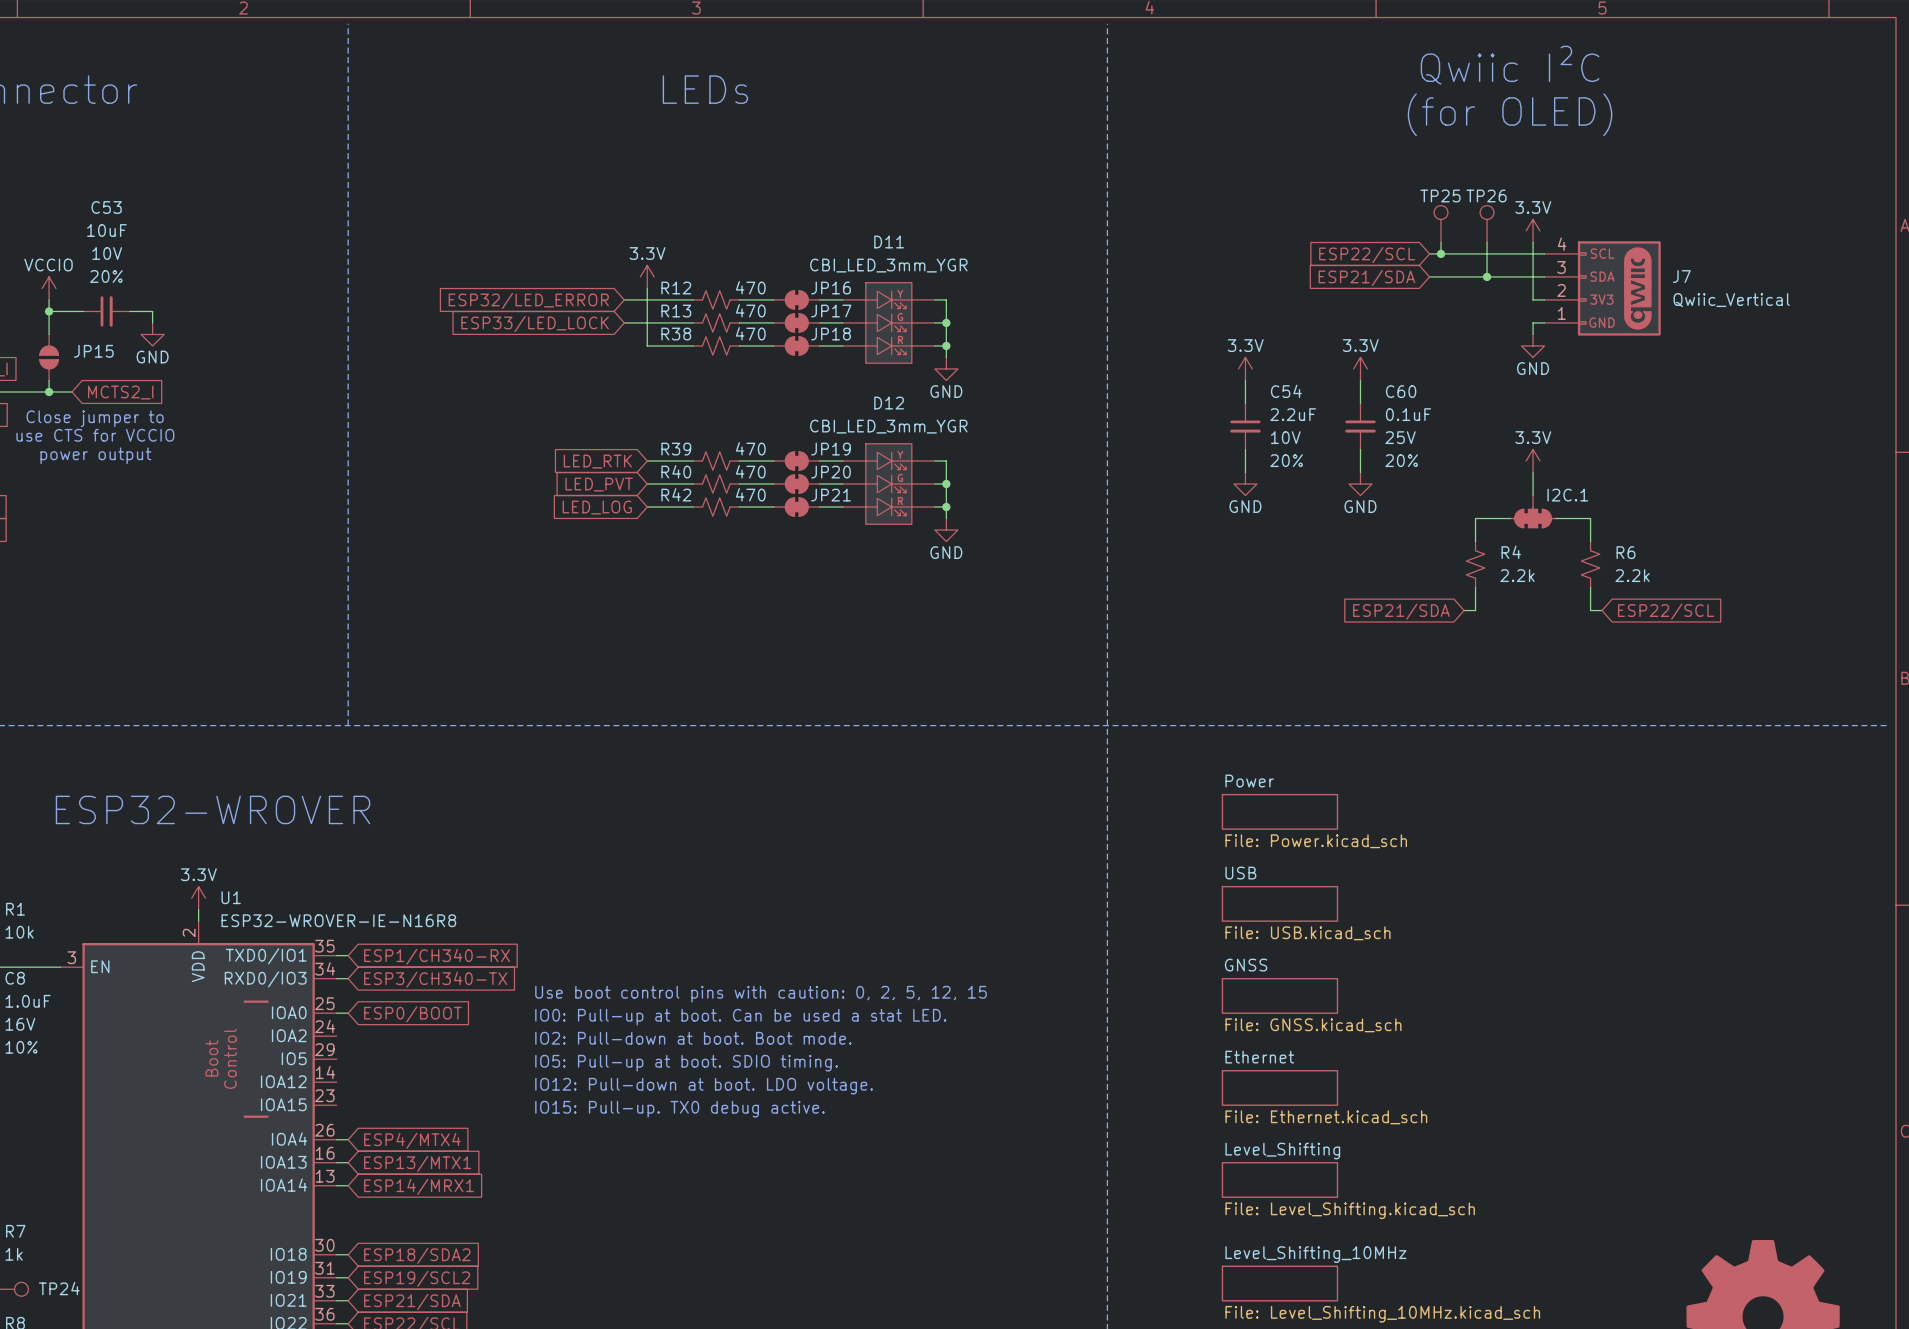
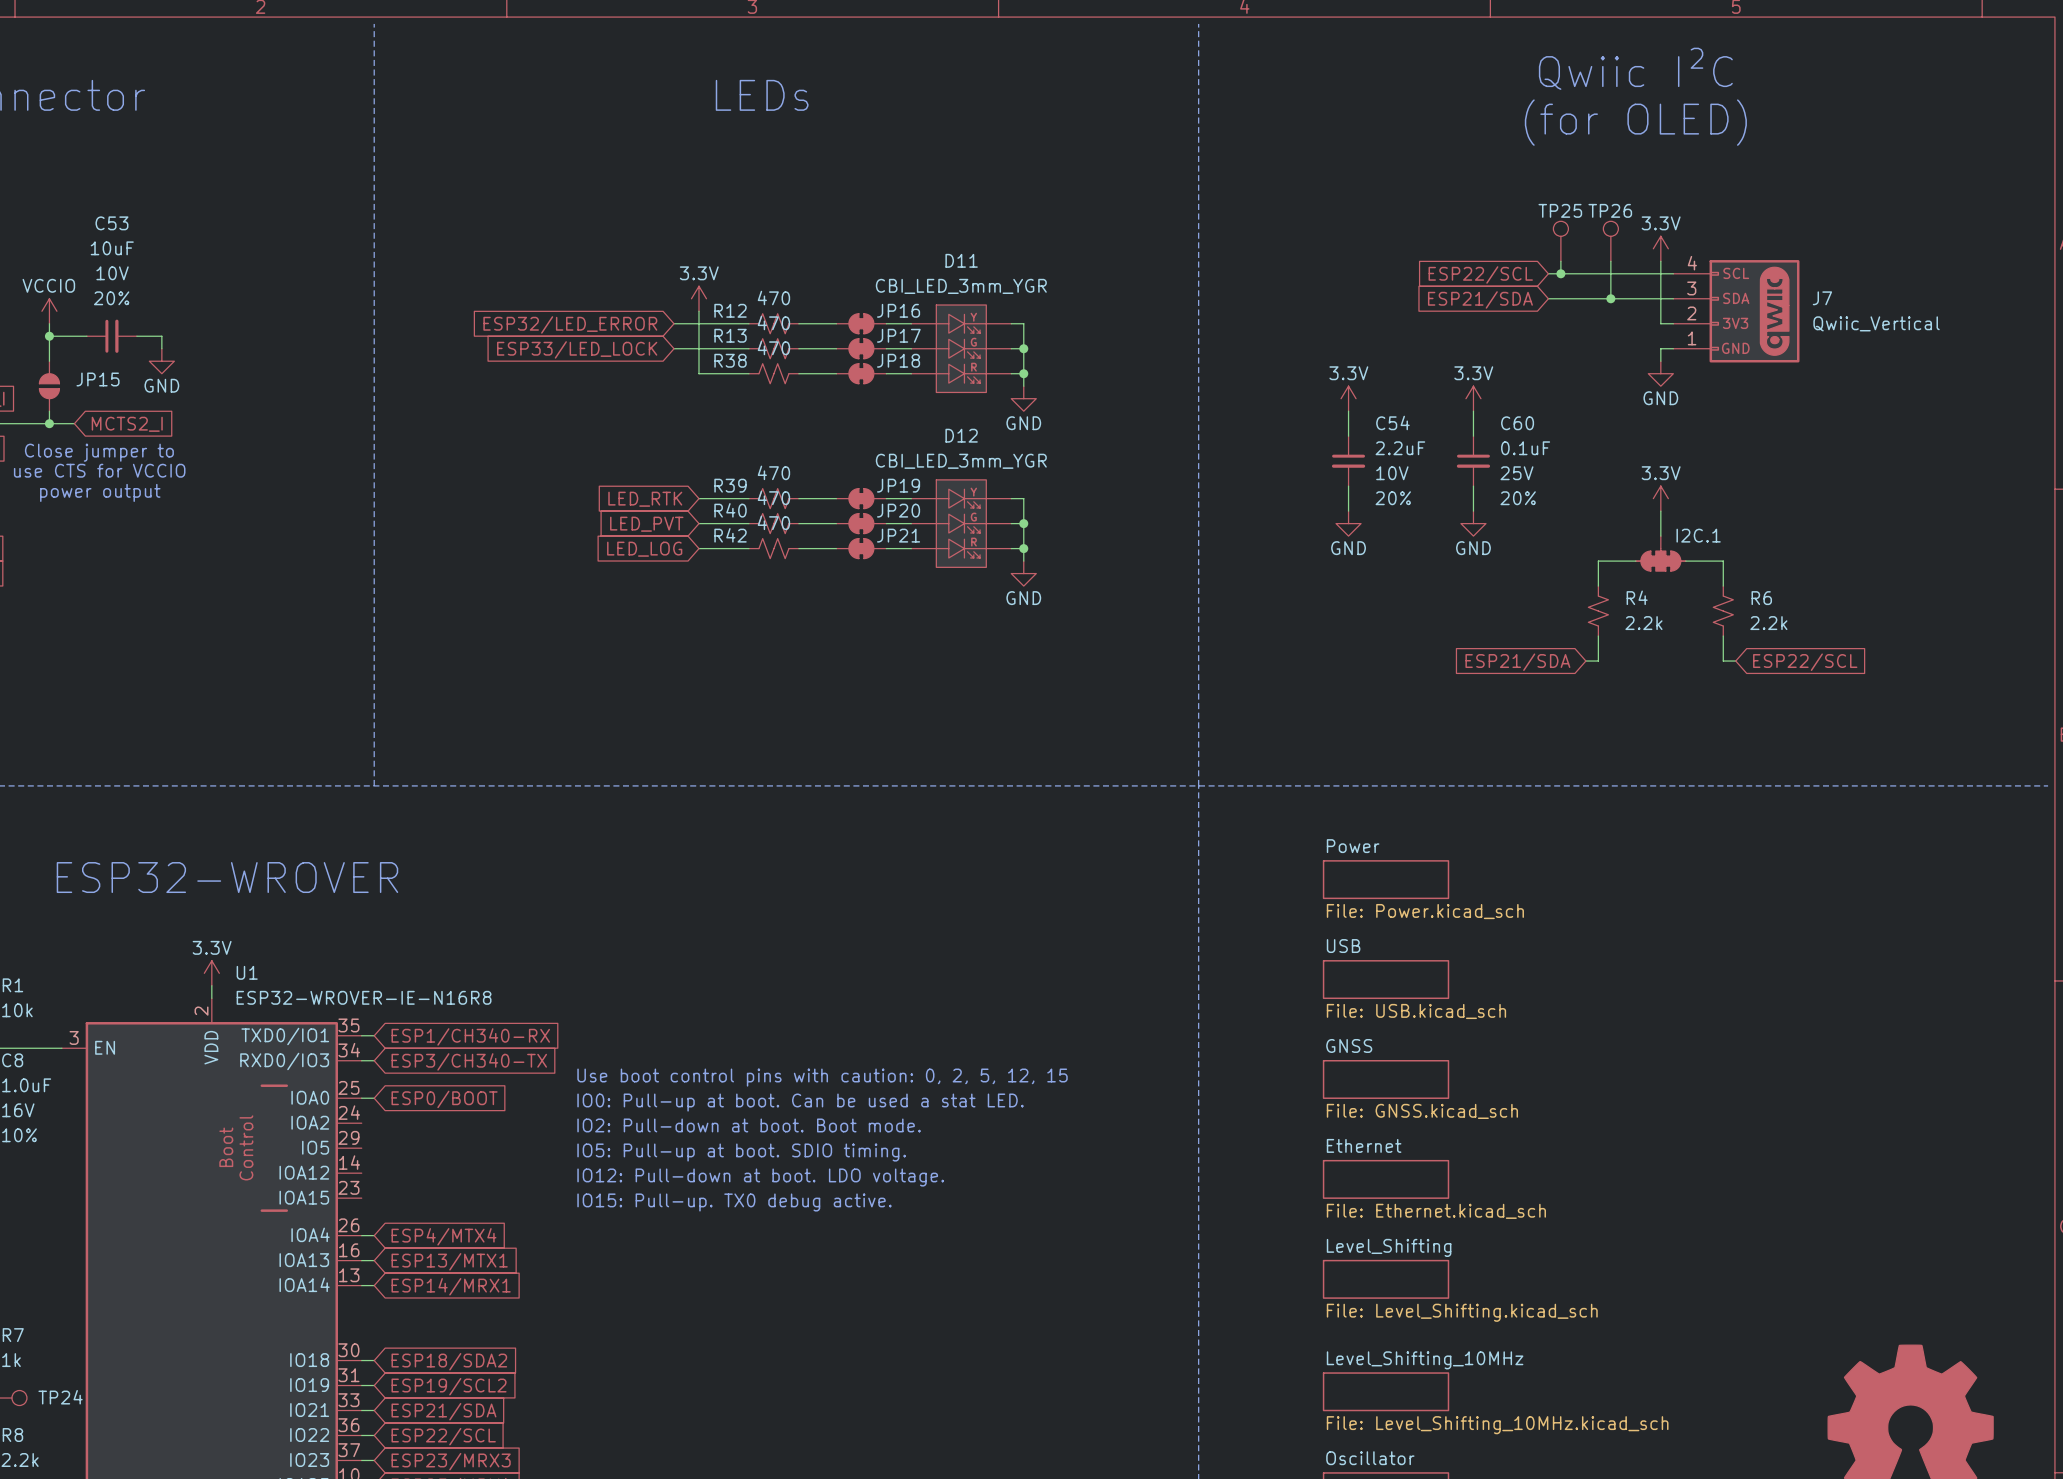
R12 value position: 470 (750, 287) -> 470 (773, 298)
R13 value position: 470 (750, 310) -> 470 (773, 322)
R38 value position: 470 (750, 333) -> 470 (773, 347)
R39 value position: 470 (750, 448) -> 470 (773, 472)
R40 value position: 470 (750, 471) -> 470 (773, 497)
R42 value position: 470 (750, 494) -> 470 (773, 522)

